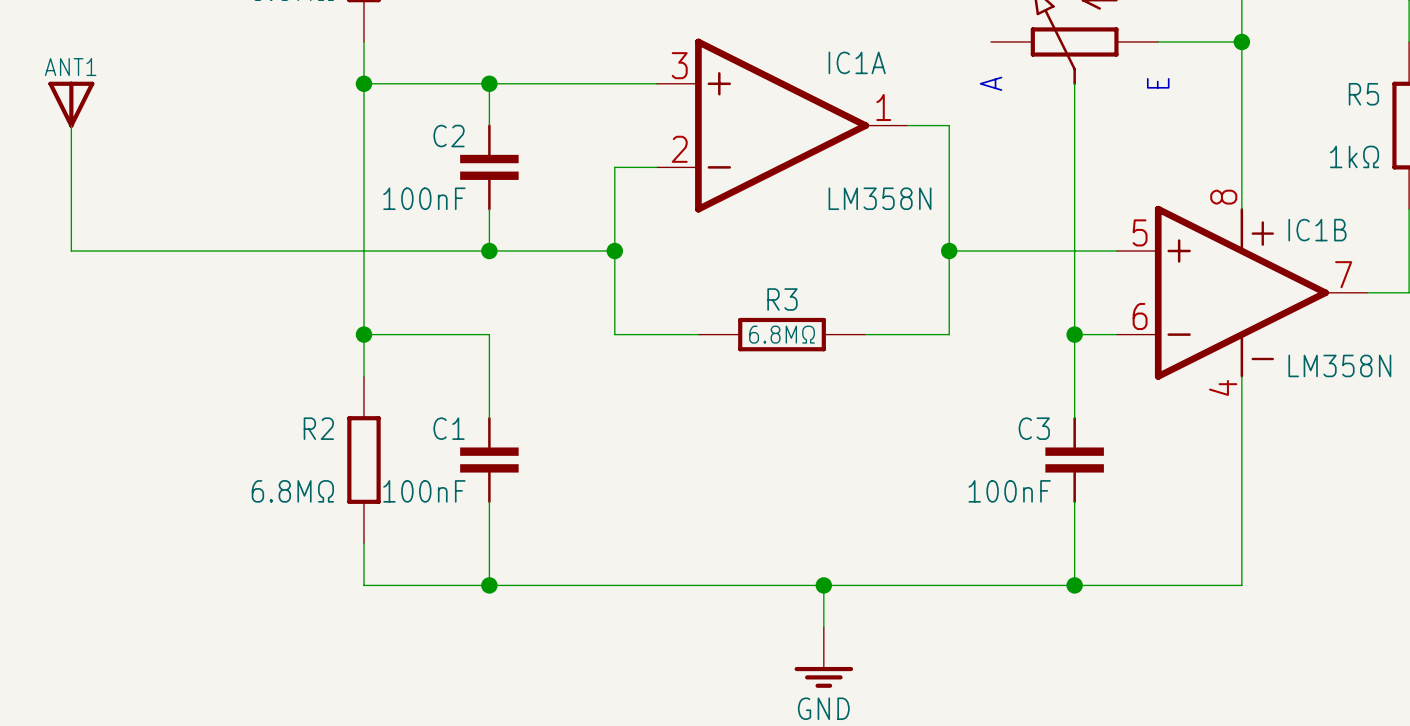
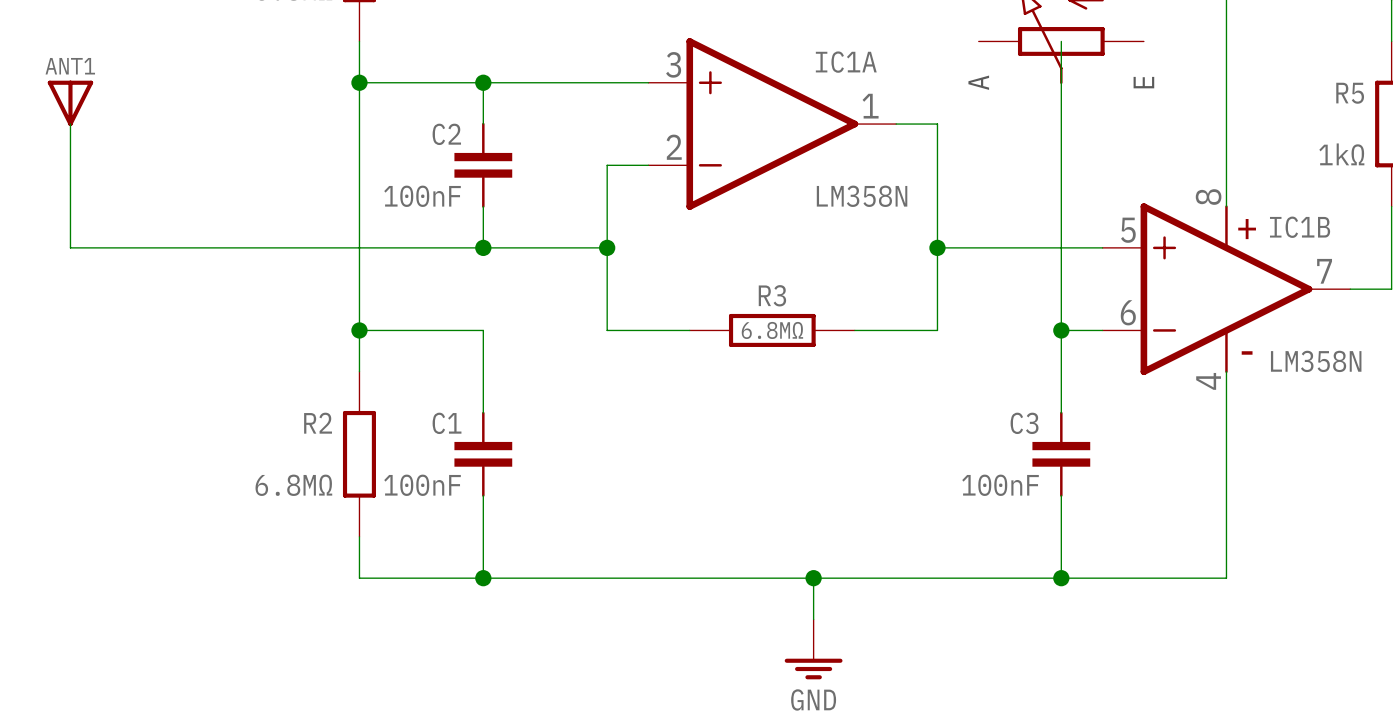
wire: none -> (1061, 41) (1061, 82)
wire: (1158, 41) (1241, 41) -> none
junction: (1241, 41) -> none

